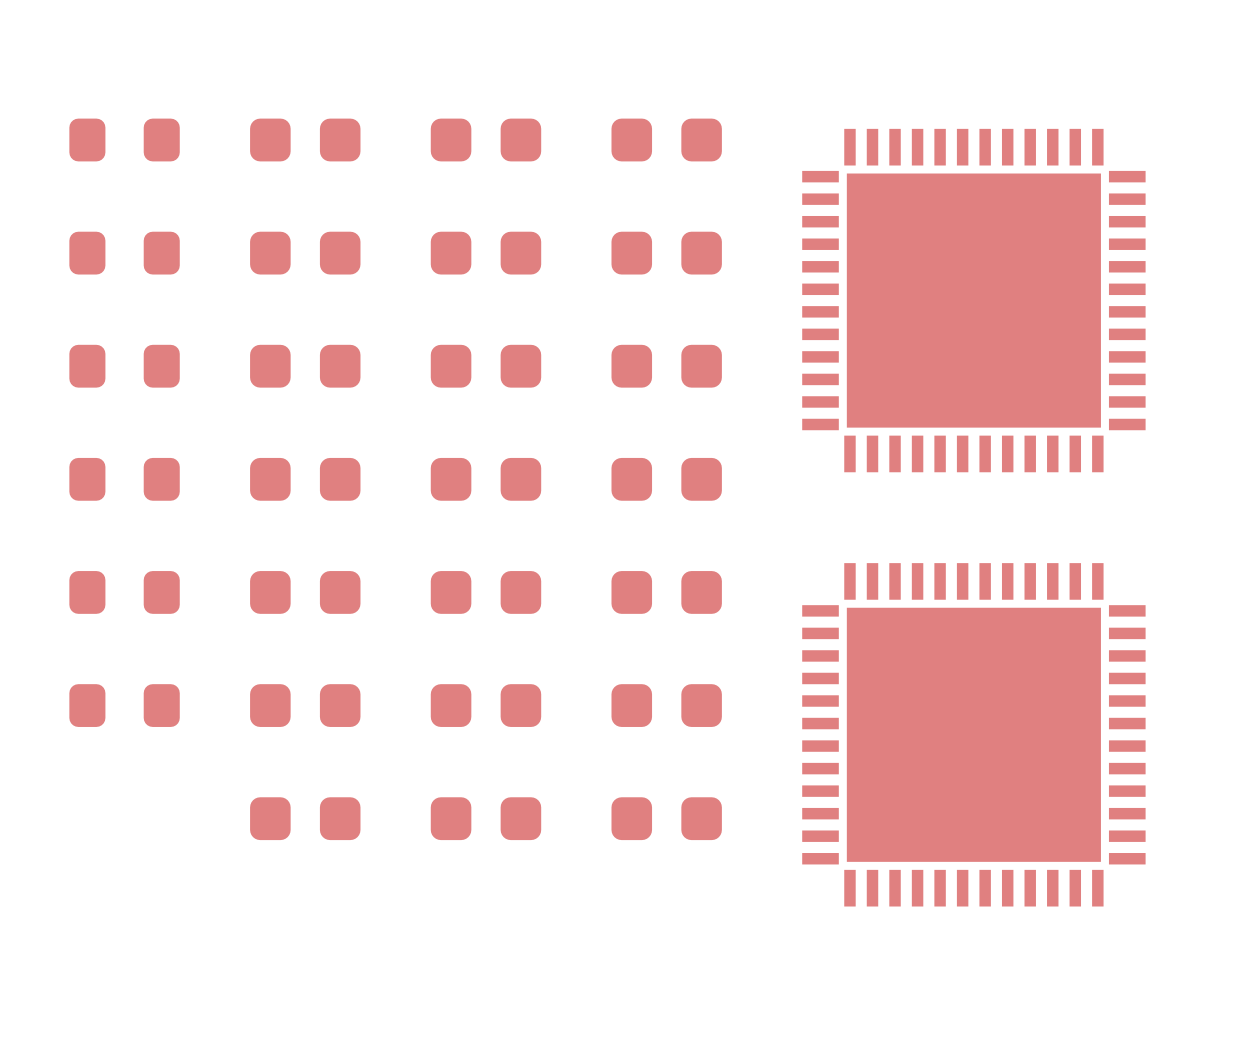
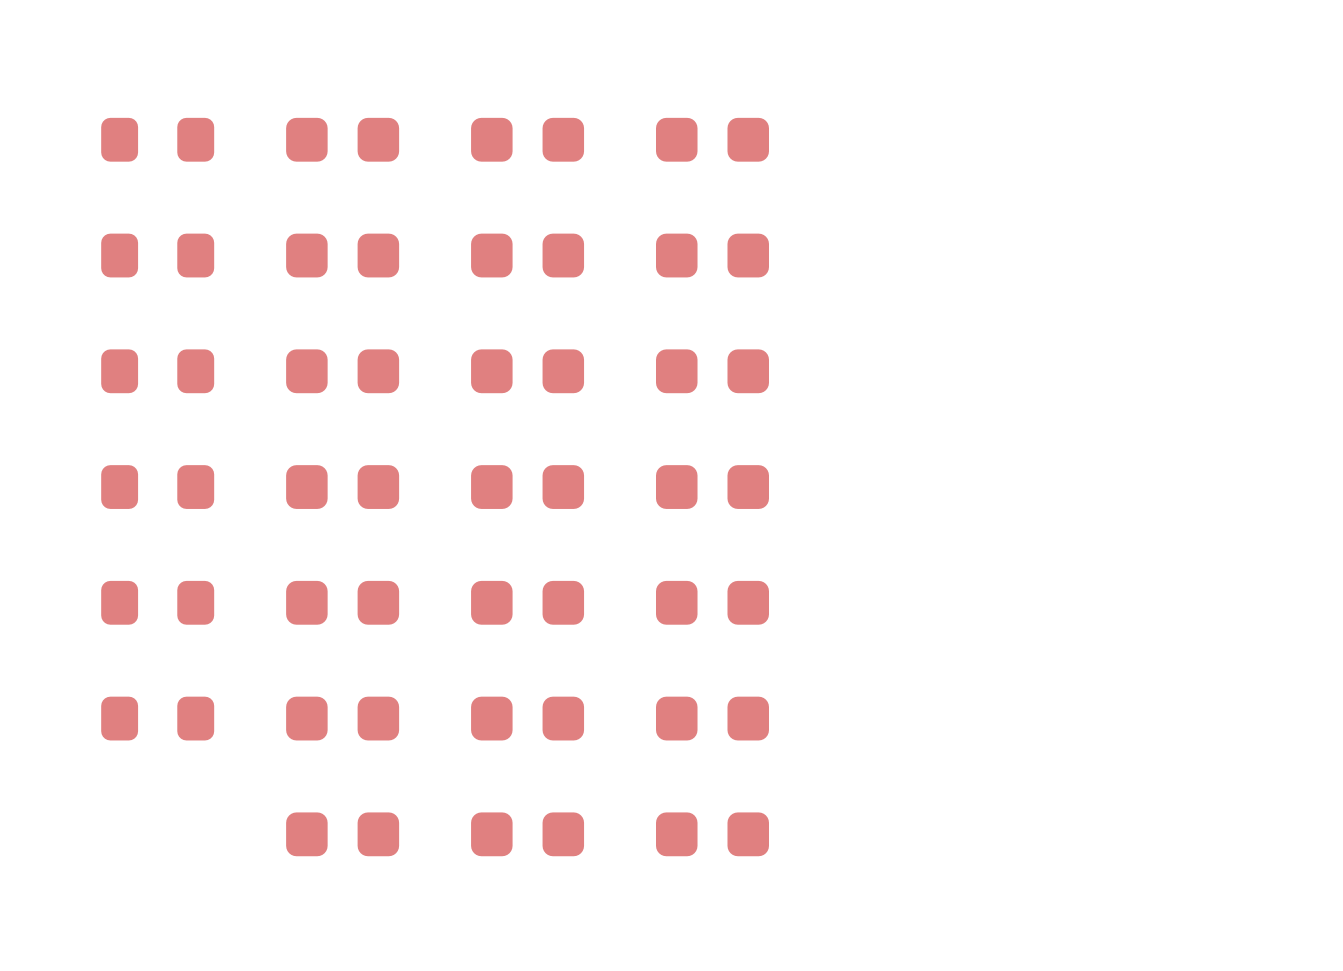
part: (973, 300) -> none
part: (973, 734) -> none

